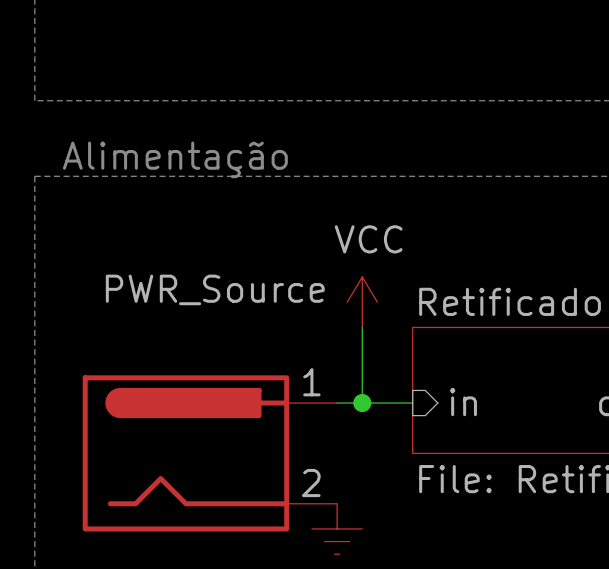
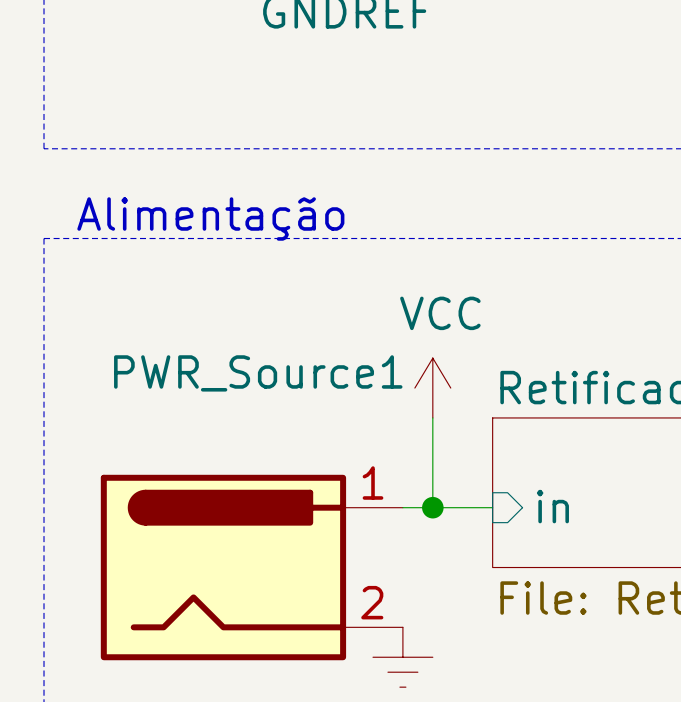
PWR_Source name: PWR_Source (215, 289) -> PWR_Source1 (258, 373)

